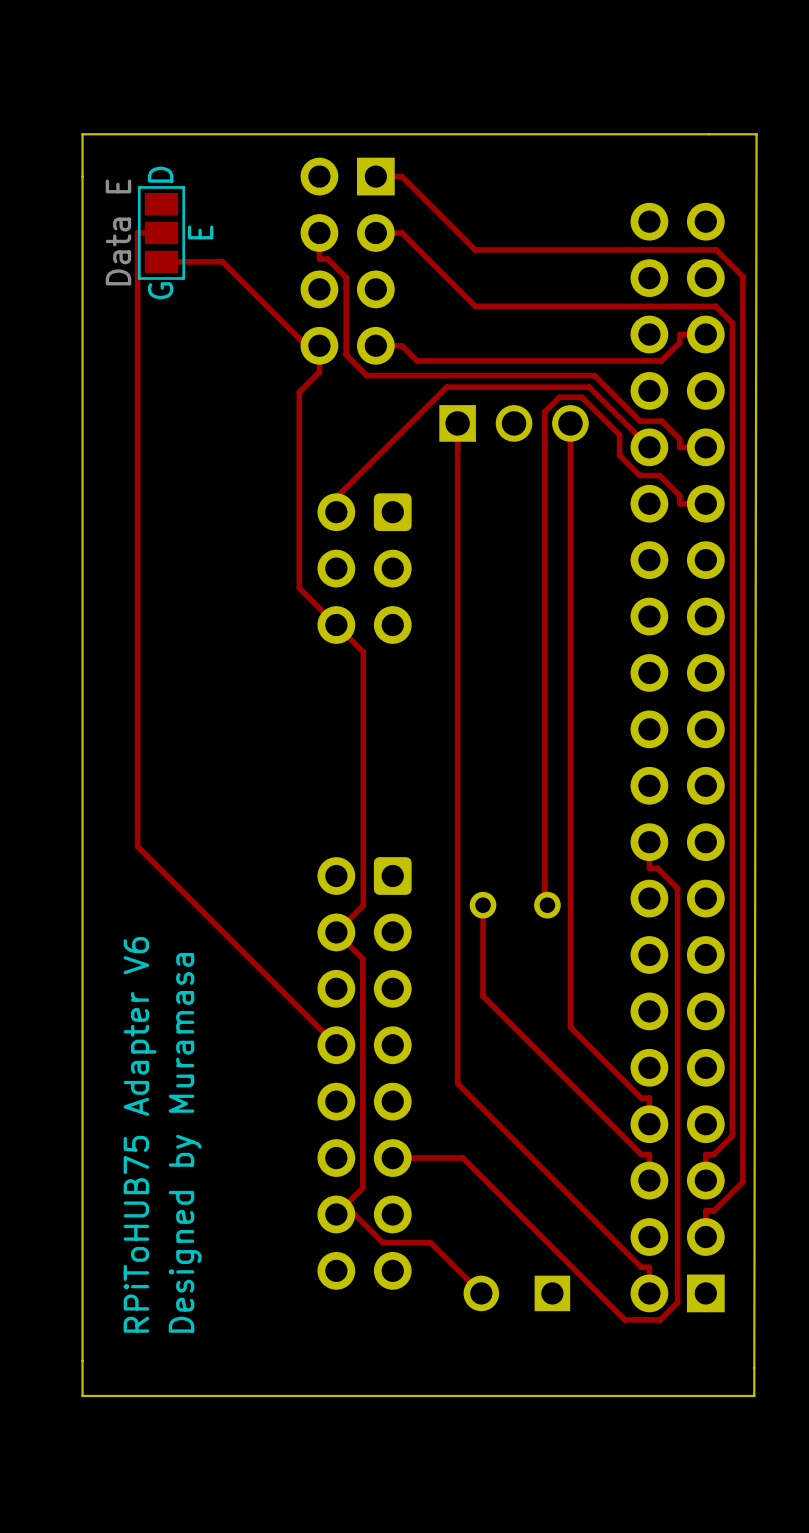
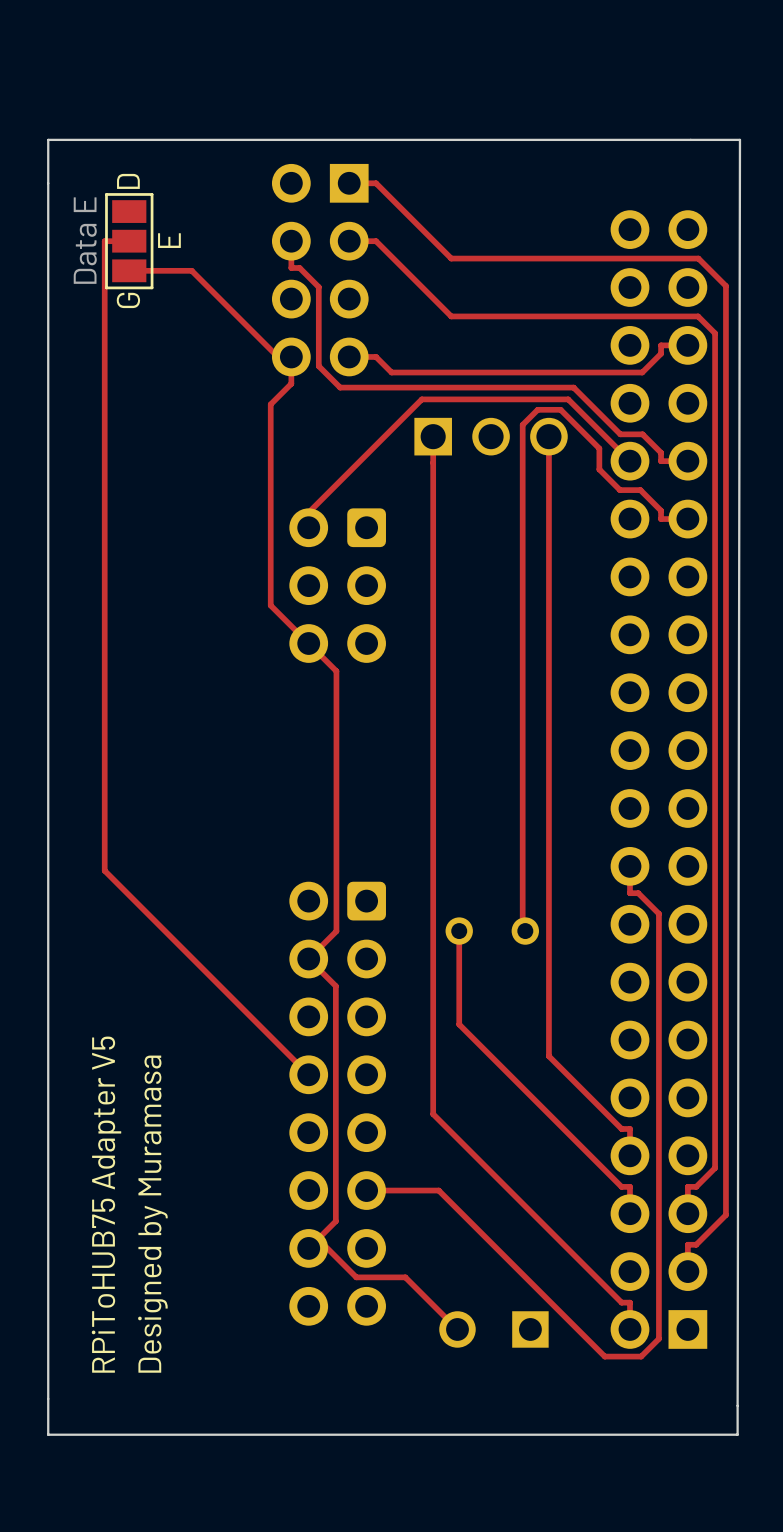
text: RPiToHUB75 Adapter V6 (140, 1134) -> RPiToHUB75 Adapter V5 (106, 1204)

